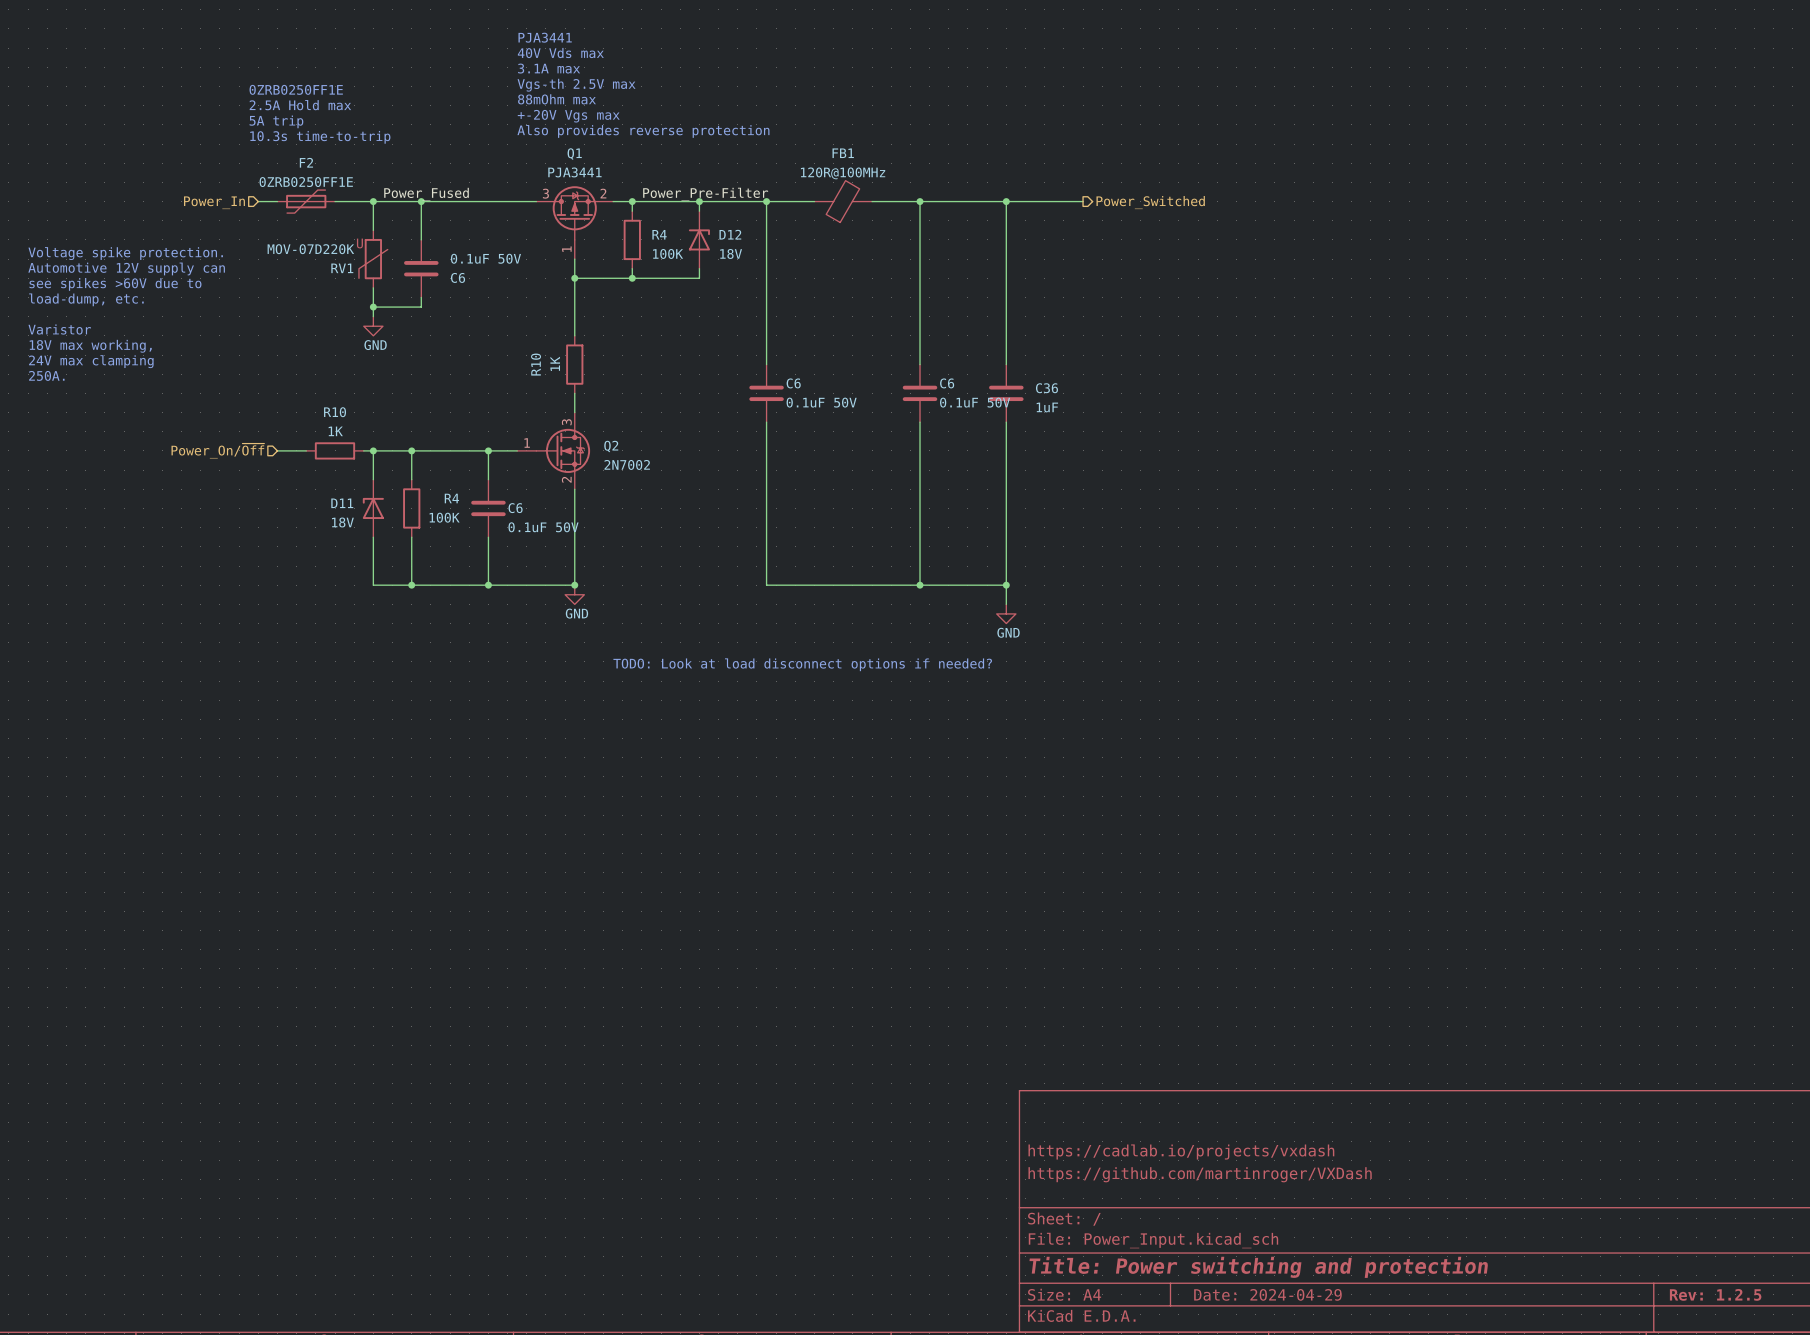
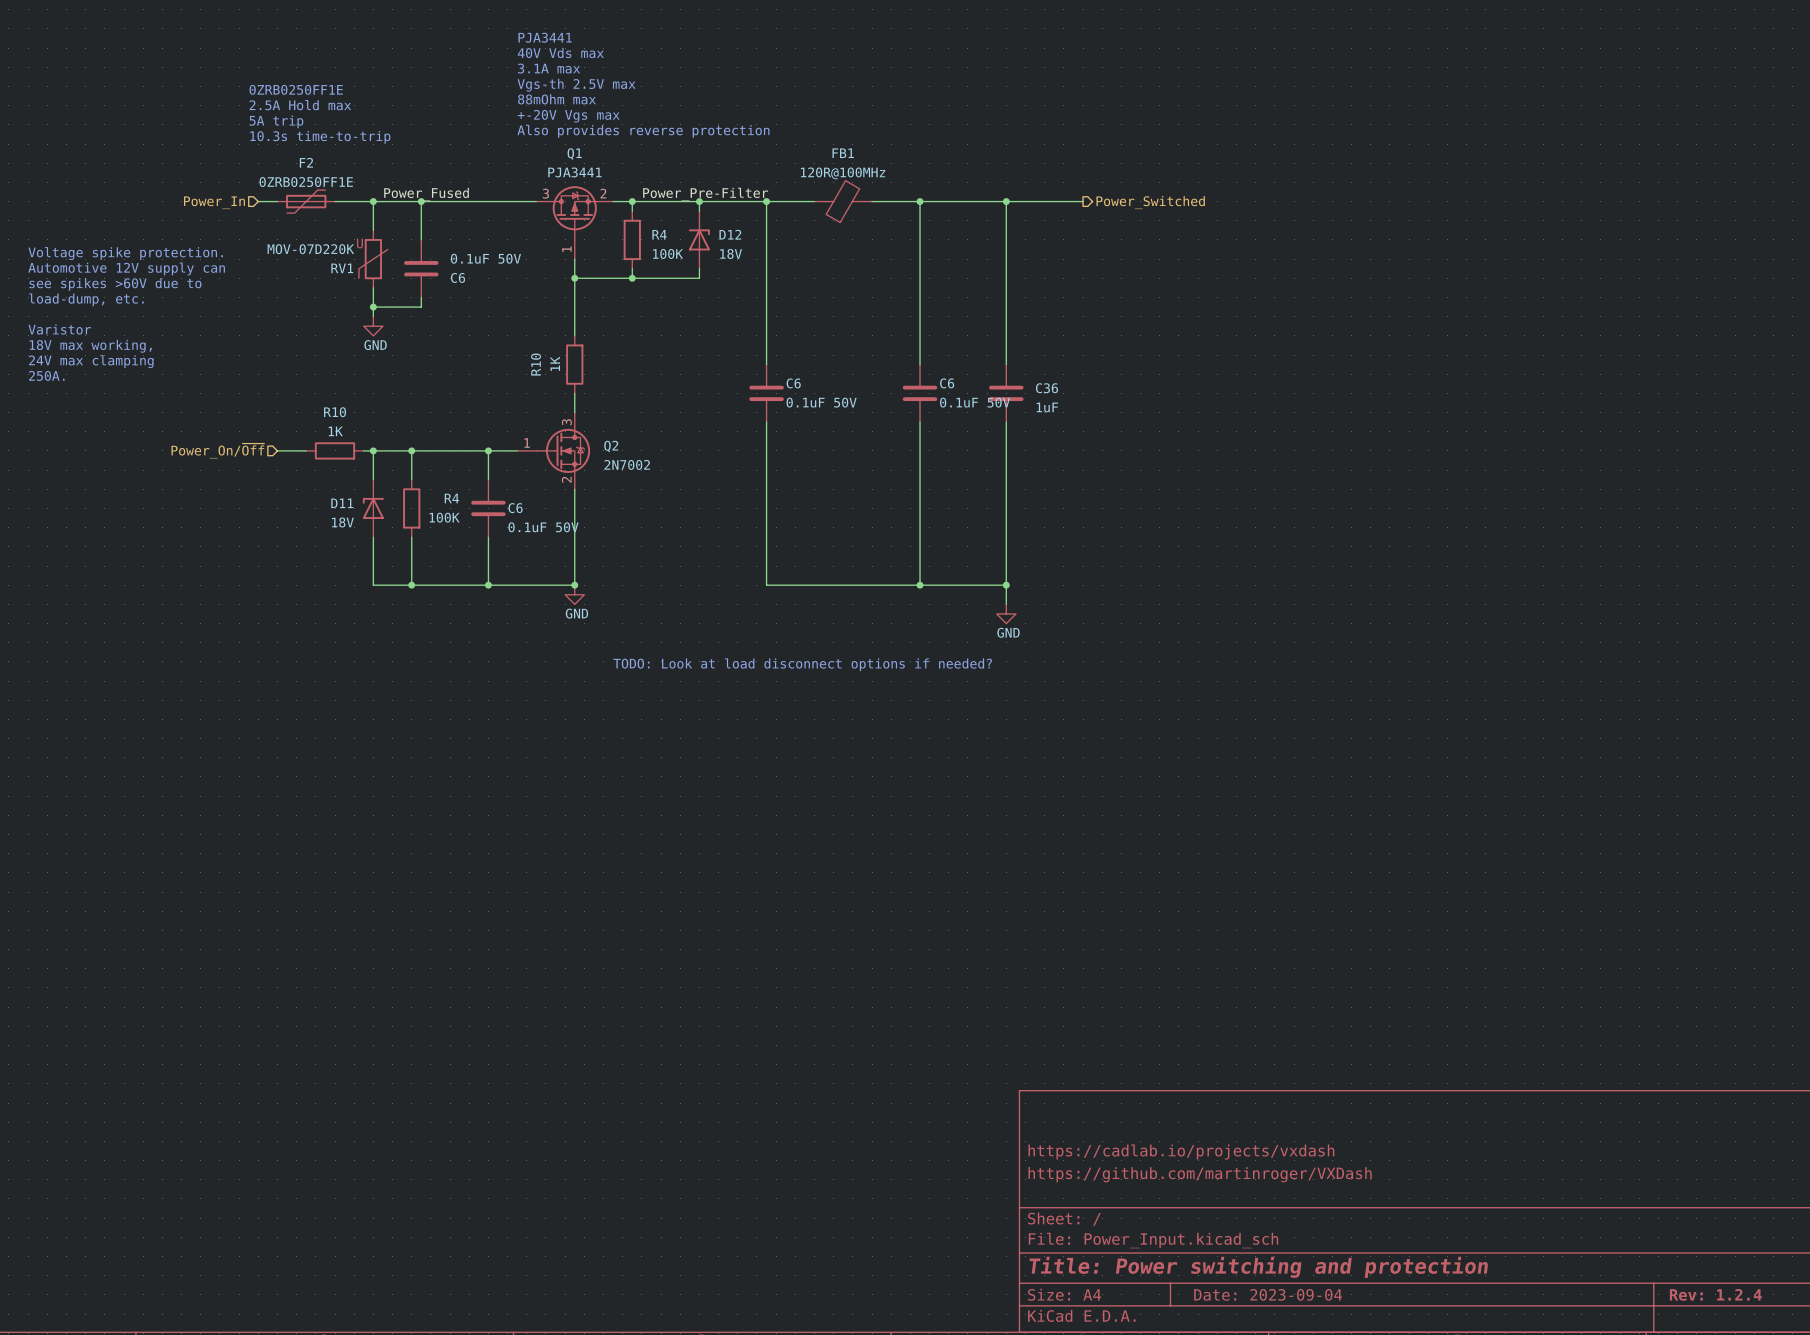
title block: Date: 2024-04-29 (1267, 1294) -> Date: 2023-09-04 (1268, 1294)
title block: Rev: 1.2.5 (1715, 1294) -> Rev: 1.2.4 (1715, 1294)

